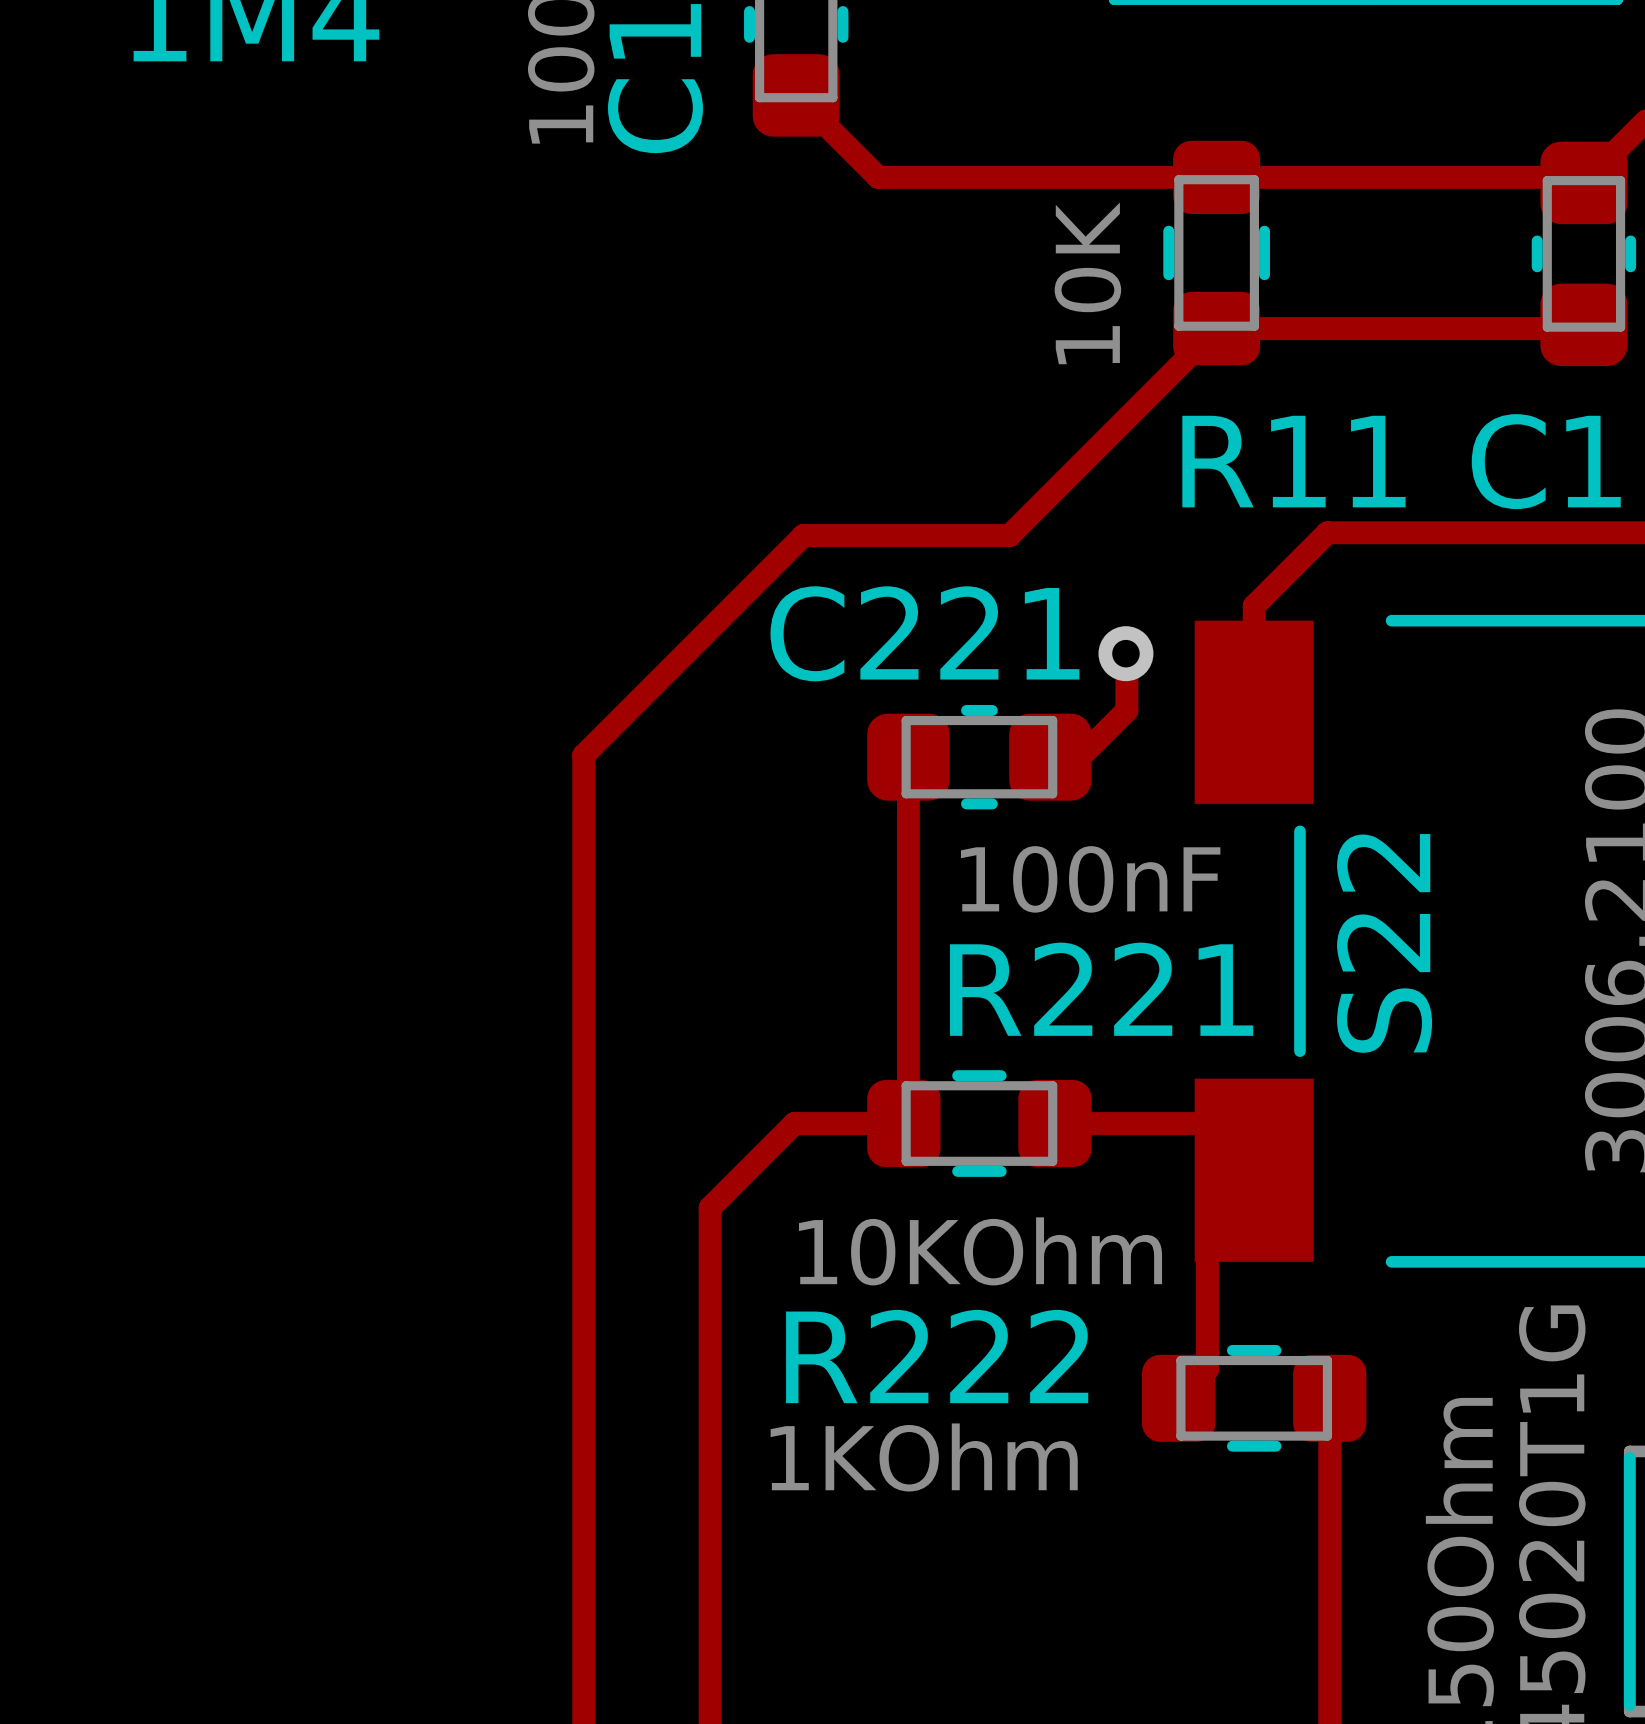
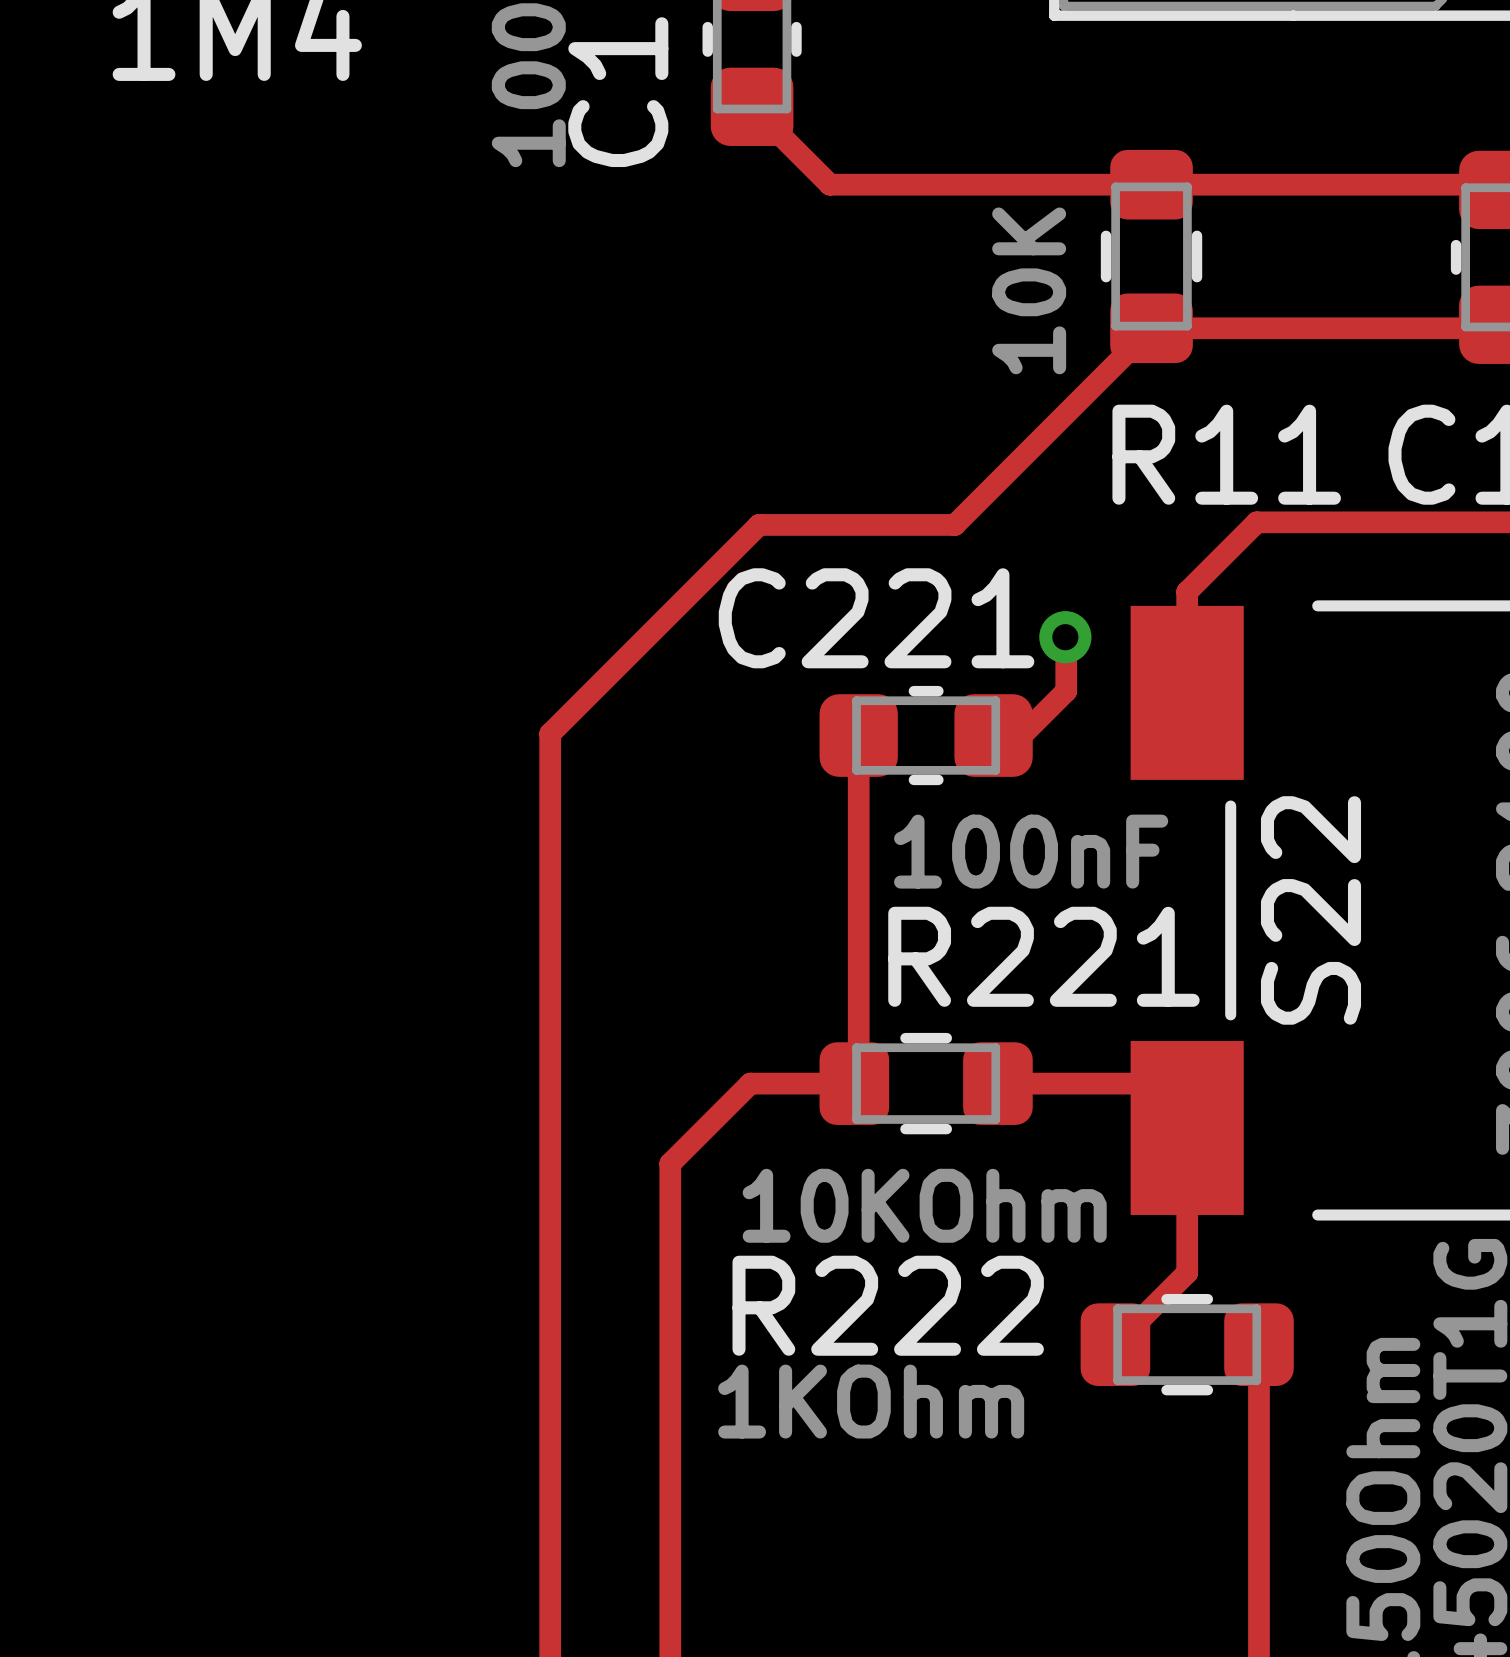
track: (1254, 1170) (1207, 1216) (1207, 1369) -> (1187, 1127) (1187, 1272) (1142, 1317)

